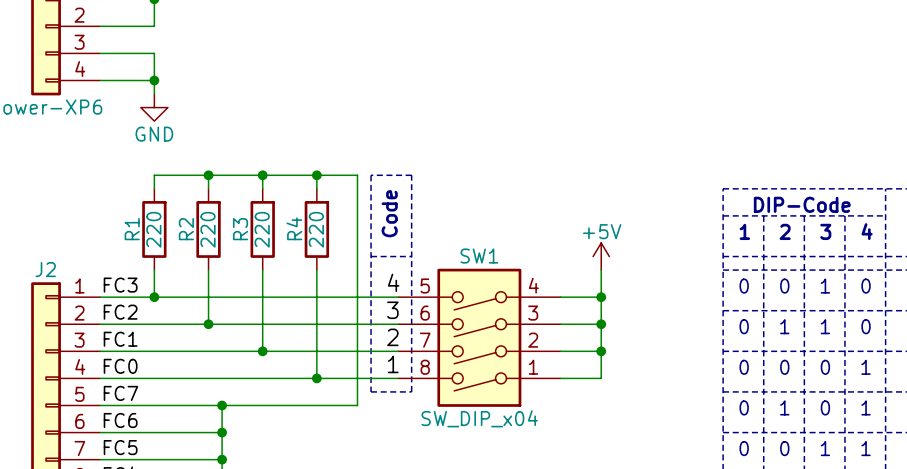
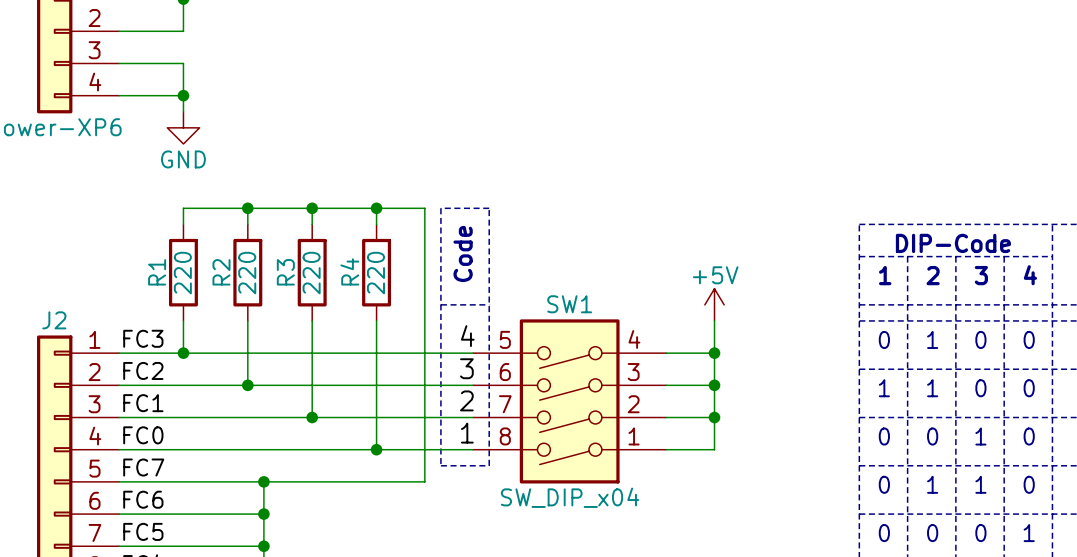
text: 0 (784, 286) -> 1 (932, 339)
text: 1 (825, 286) -> 0 (980, 339)
text: 0 (744, 326) -> 1 (884, 388)
text: 1 (825, 326) -> 0 (980, 388)
text: 0 (825, 367) -> 1 (980, 436)
text: 1 (866, 367) -> 0 (1029, 436)
text: 0 (825, 407) -> 1 (980, 484)
text: 1 (866, 407) -> 0 (1029, 484)
text: 1 (825, 448) -> 0 (980, 533)

